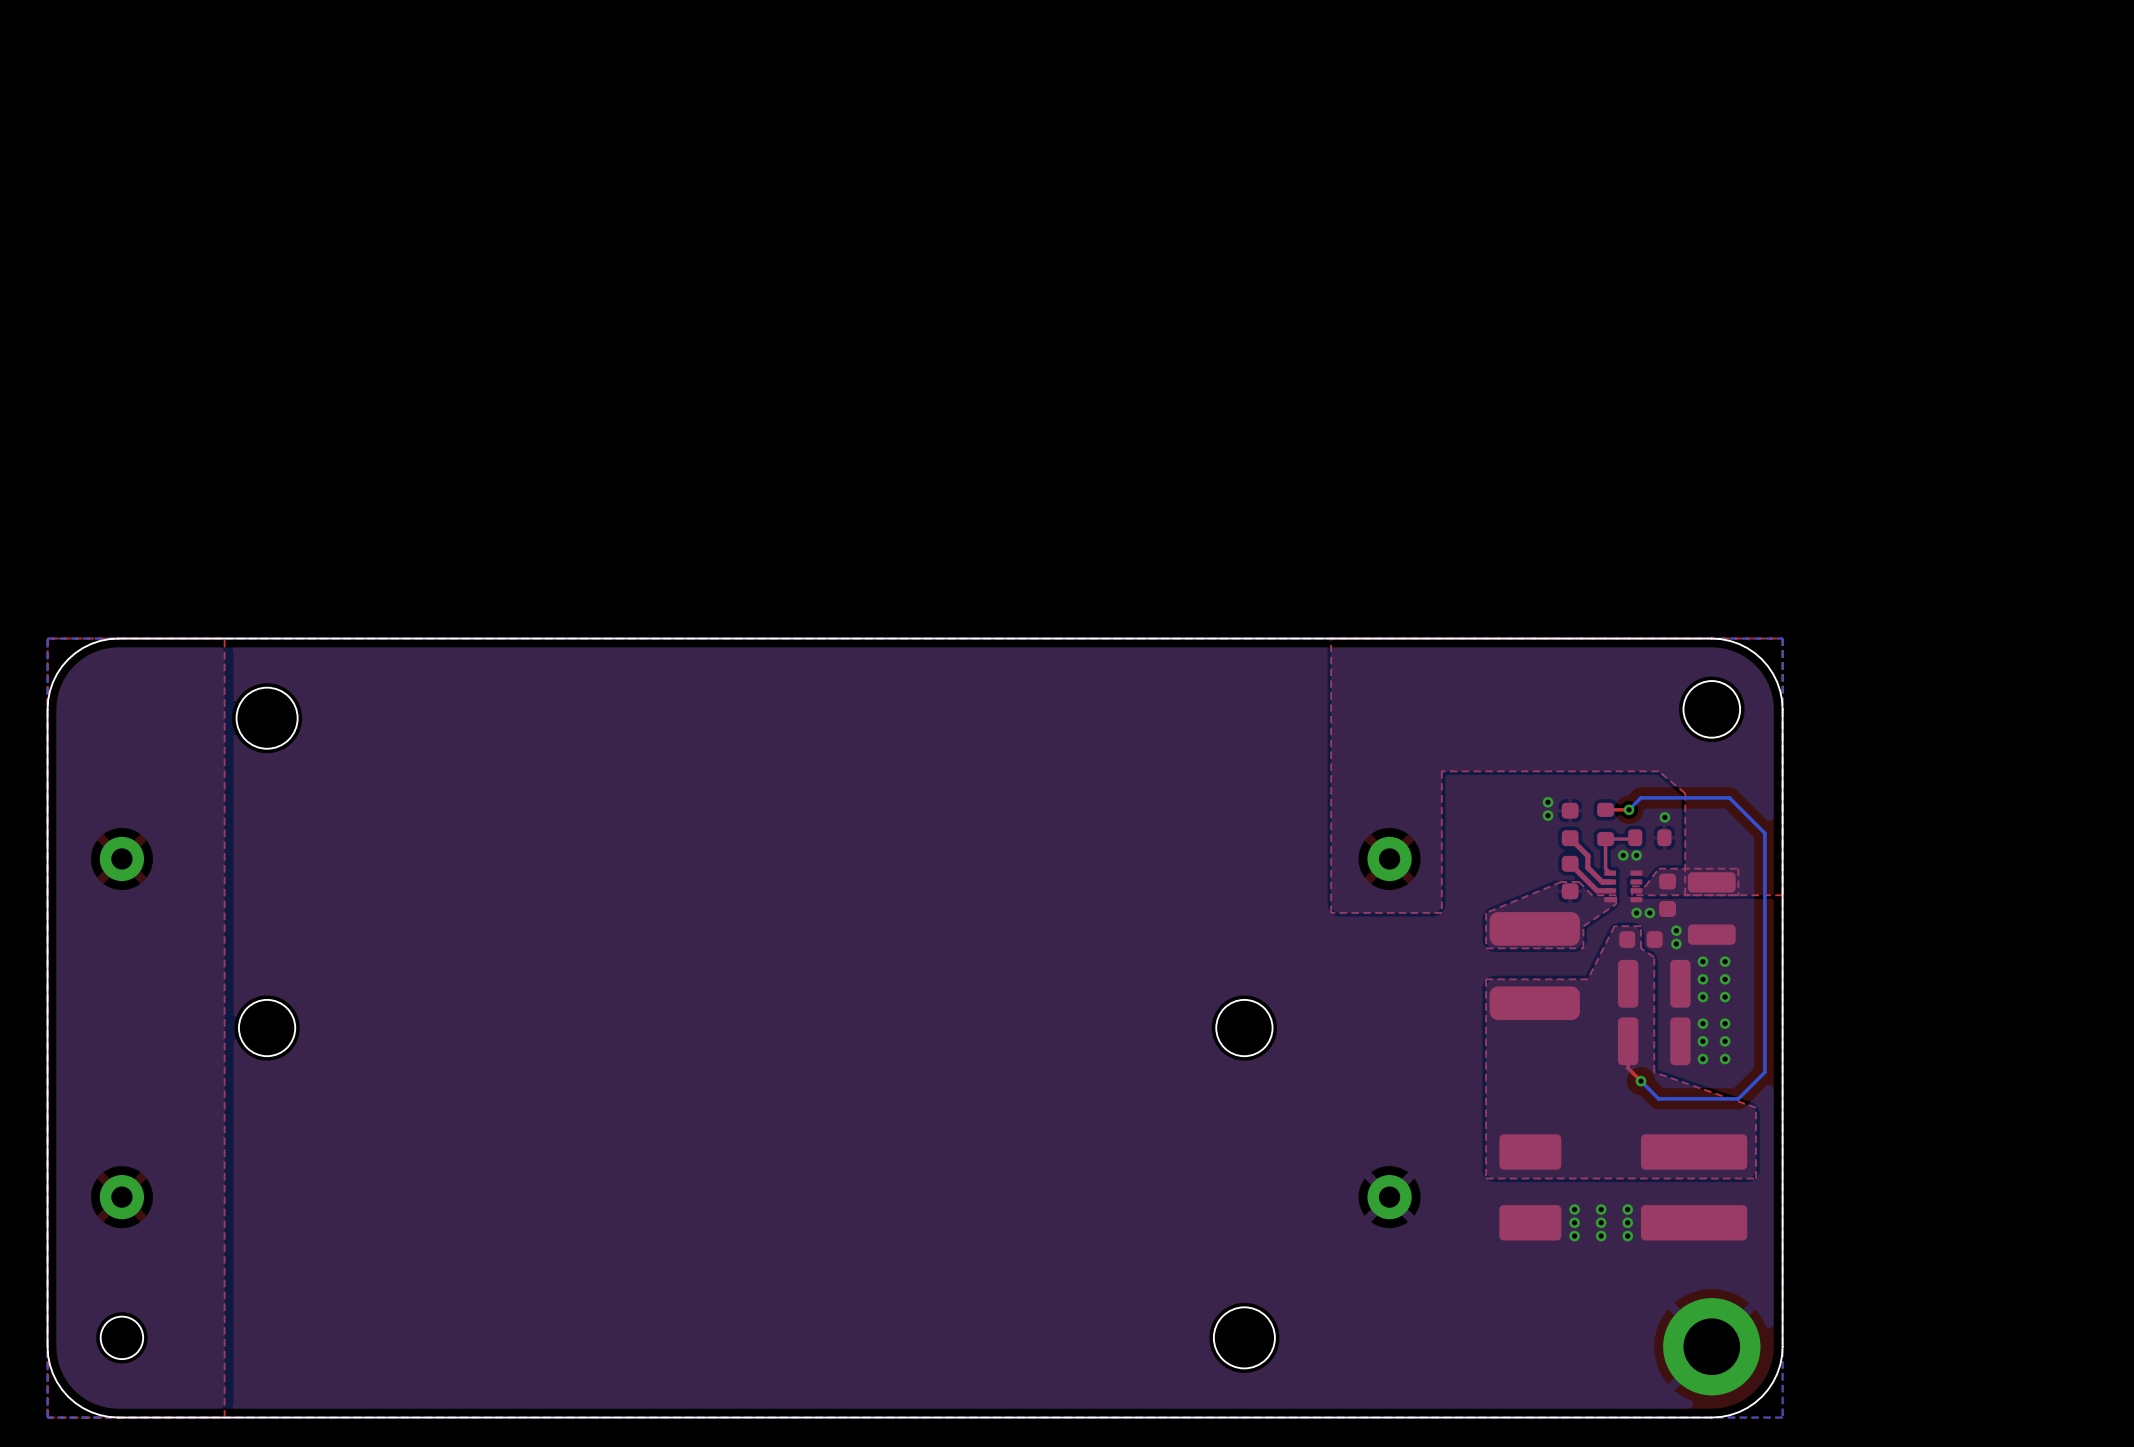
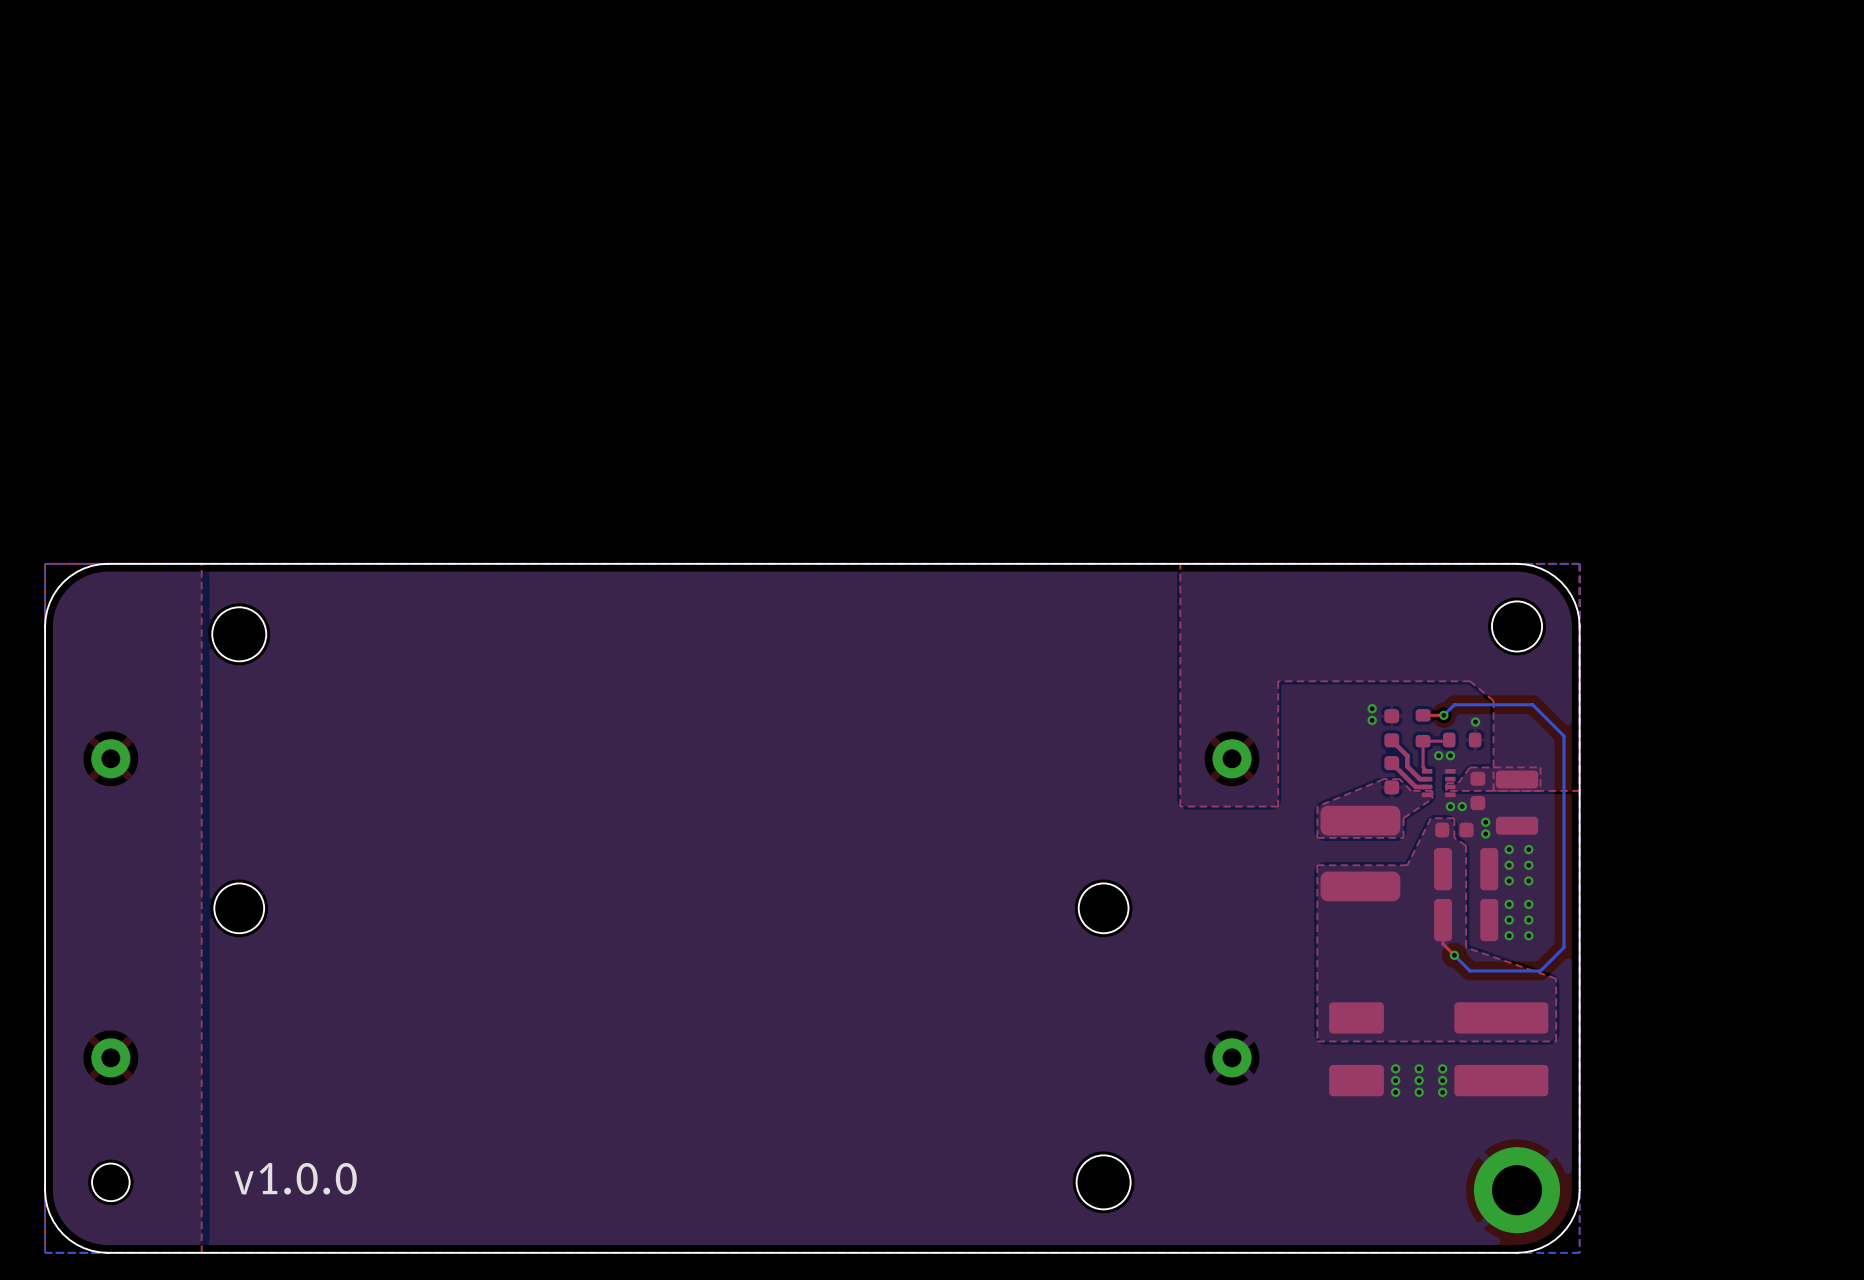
text: none -> v1.0.0 (295, 1178)

